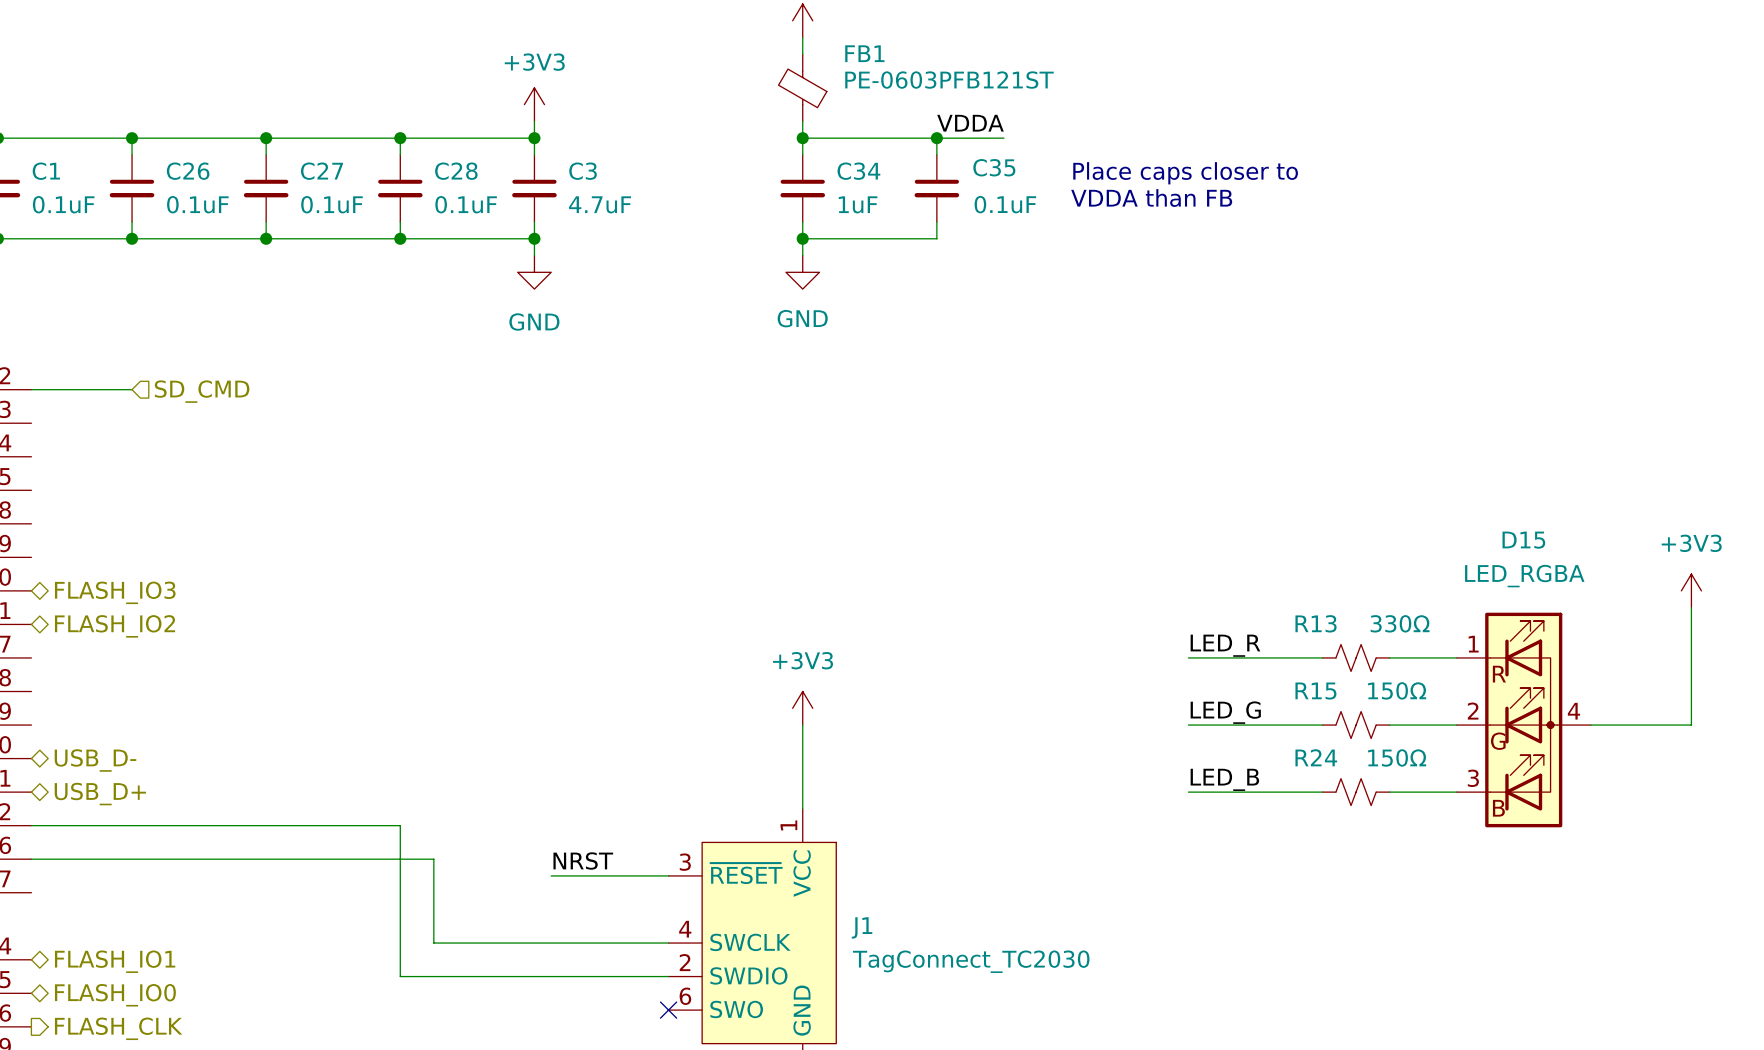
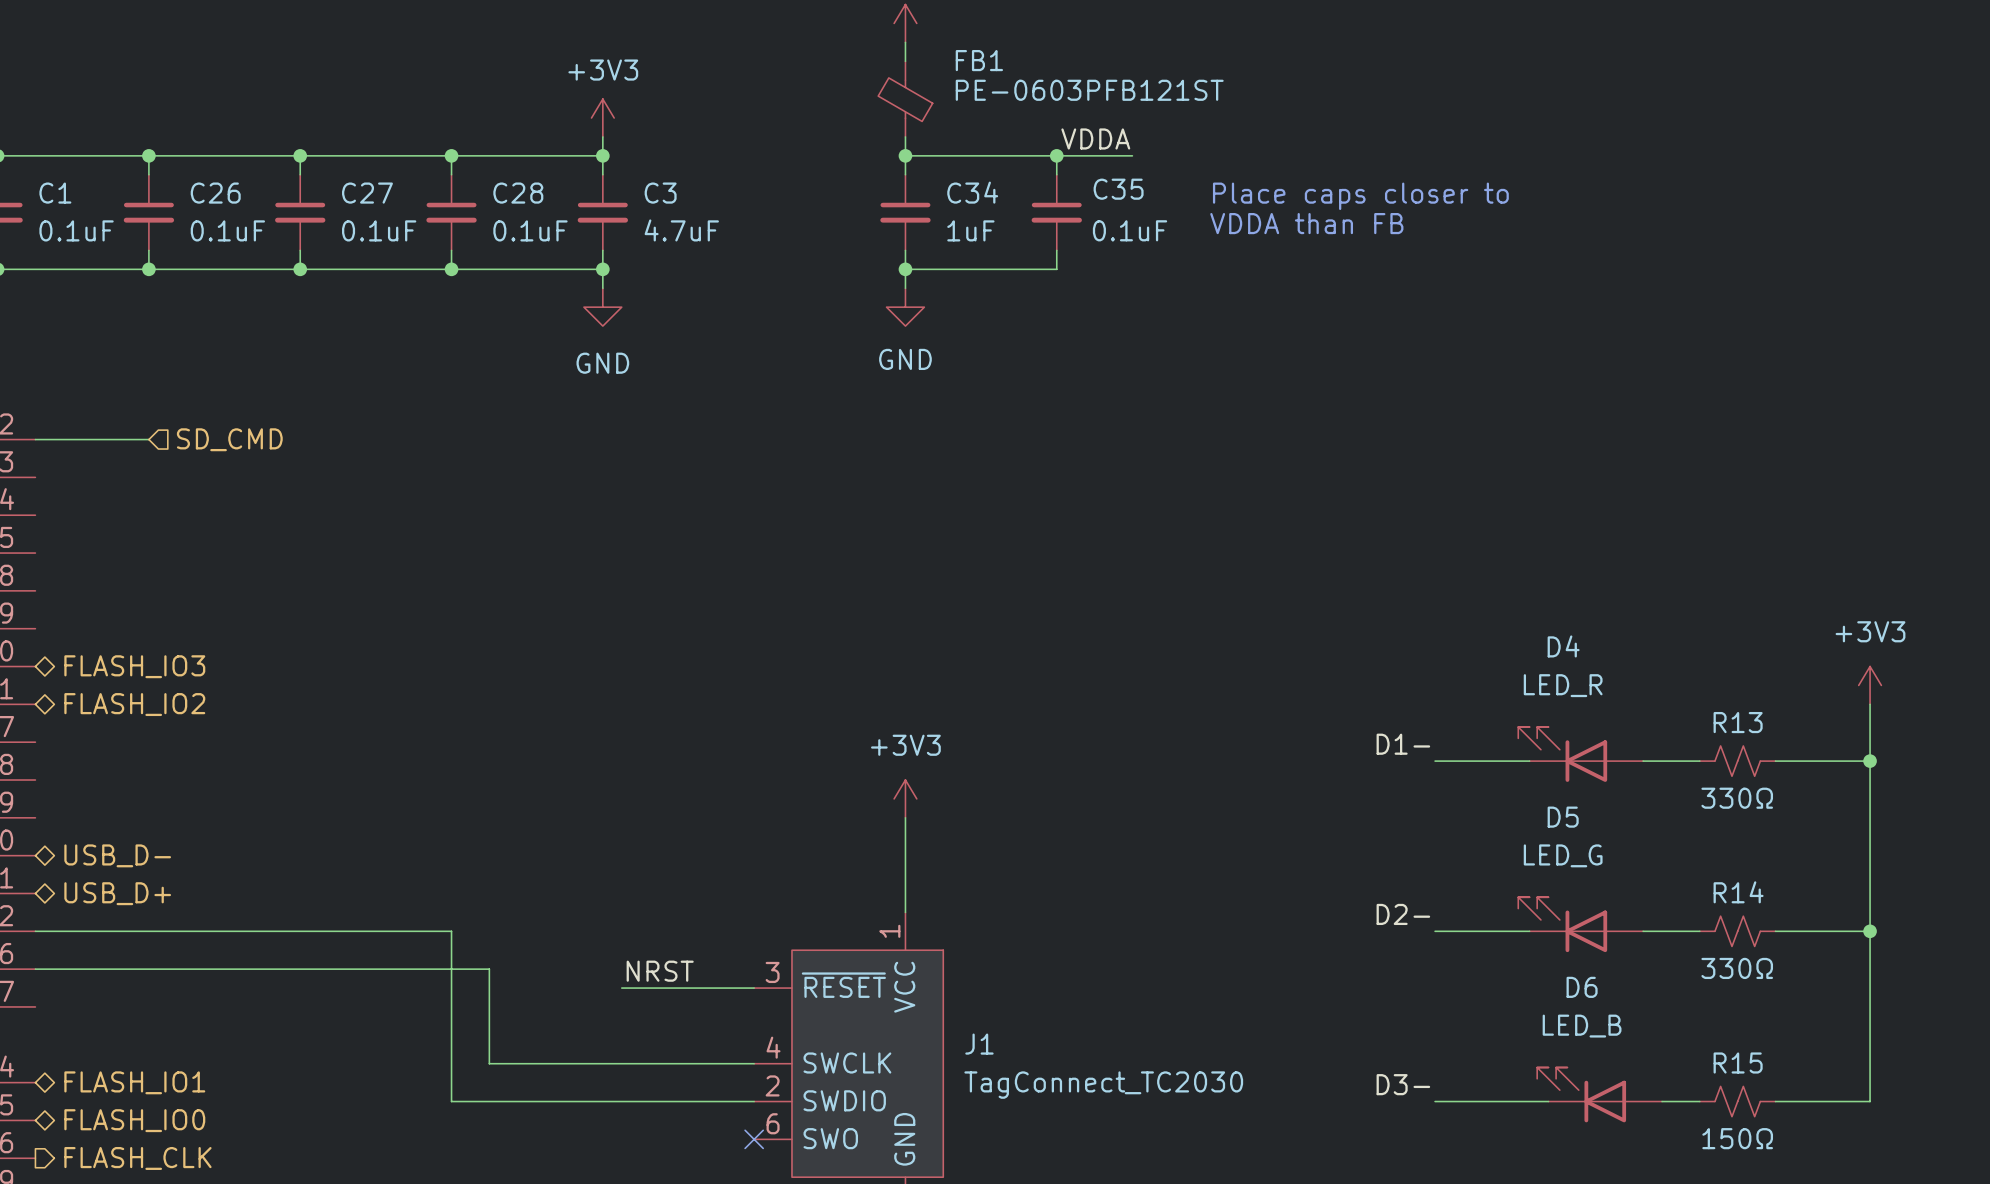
power symbol position: +3V3 (1691, 590) -> +3V3 (1870, 685)
wire: (1691, 607) (1691, 725) (1590, 725) -> none
R13 name position: R13 (1316, 623) -> R13 (1738, 722)
R13 value position: 330Ω (1400, 623) -> 330Ω (1737, 798)
wire: none -> (1870, 704) (1870, 1101) (1775, 1101)
label: LED_R (1225, 645) -> none
wire: (1188, 657) (1322, 657) -> none
R13 position: (1356, 657) -> (1737, 761)
wire: (1389, 657) (1456, 657) -> none
label: none -> D1- (1403, 744)
D4: none -> LED_R (1580, 754)
wire: none -> (1435, 761) (1529, 761)
wire: none -> (1643, 761) (1699, 761)
wire: none -> (1775, 761) (1870, 761)
junction: none -> (1870, 761)
R15 value position: 150Ω (1397, 690) -> 150Ω (1737, 1138)
R15 name position: R15 (1315, 691) -> R15 (1738, 1063)
label: LED_G (1225, 712) -> none
D15: LED_RGBA (1523, 720) -> none
wire: (1188, 725) (1322, 725) -> none
R15 position: (1356, 725) -> (1737, 1101)
wire: (1389, 725) (1456, 725) -> none
label: LED_B (1224, 779) -> none
wire: (1188, 792) (1322, 792) -> none
R24: 150Ω (1356, 792) -> none
wire: (1389, 792) (1456, 792) -> none
label: none -> D2- (1403, 914)
D5: none -> LED_G (1580, 924)
wire: none -> (1435, 931) (1529, 931)
wire: none -> (1643, 931) (1699, 931)
R14: none -> 330Ω (1737, 931)
wire: none -> (1775, 931) (1870, 931)
junction: none -> (1870, 931)
label: none -> D3- (1403, 1084)
D6: none -> LED_B (1599, 1094)
wire: none -> (1435, 1101) (1548, 1101)
wire: none -> (1662, 1101) (1699, 1101)

